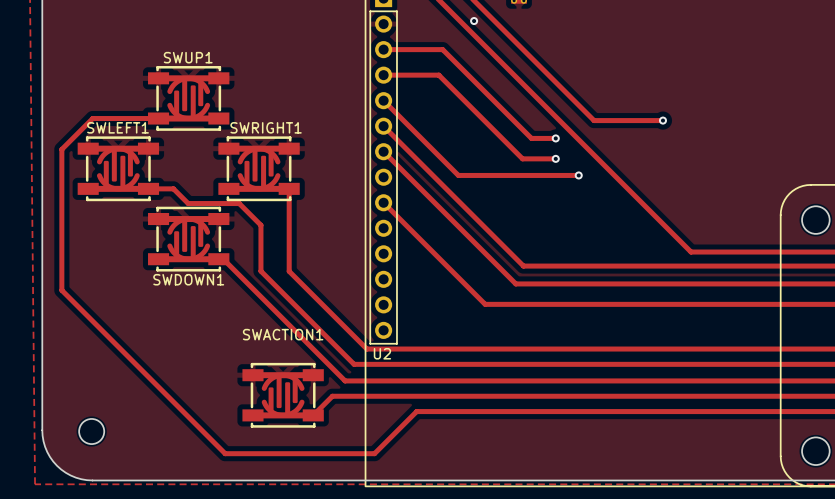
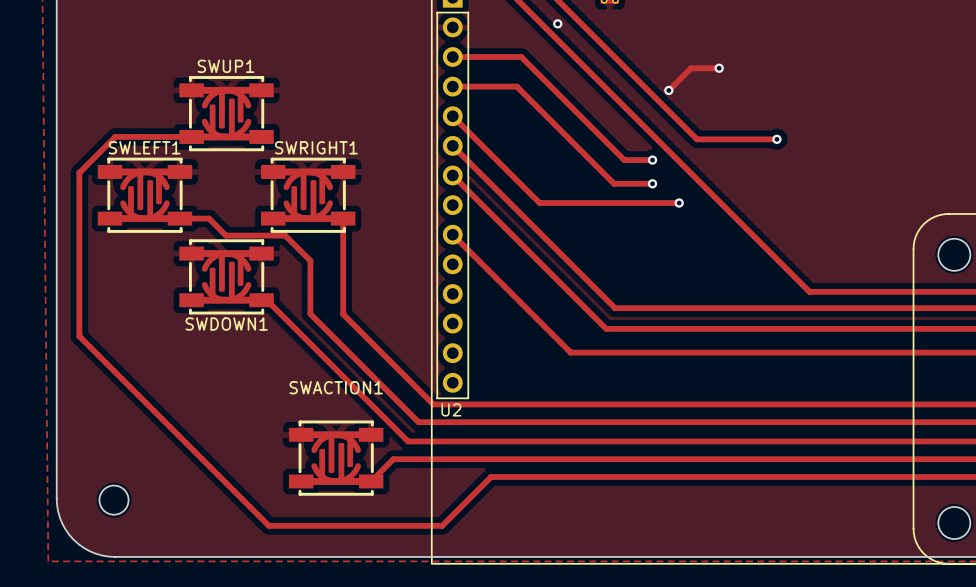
track: none -> (719, 68) (691, 68) (668, 90)
via: none -> (719, 68)
via: none -> (668, 90)

